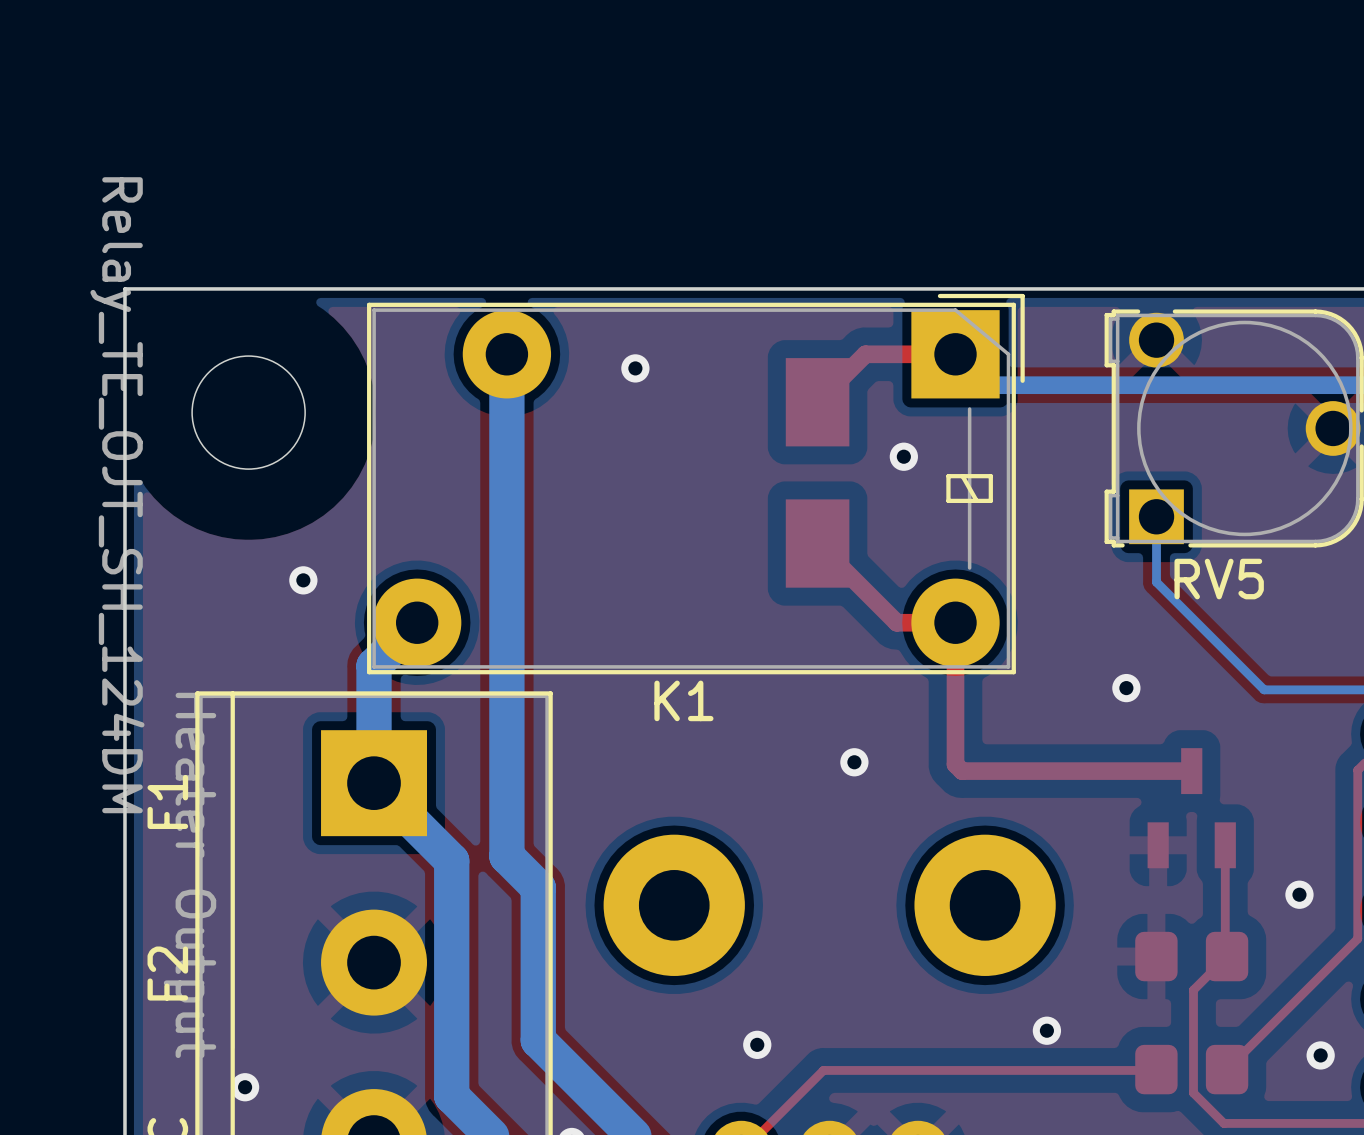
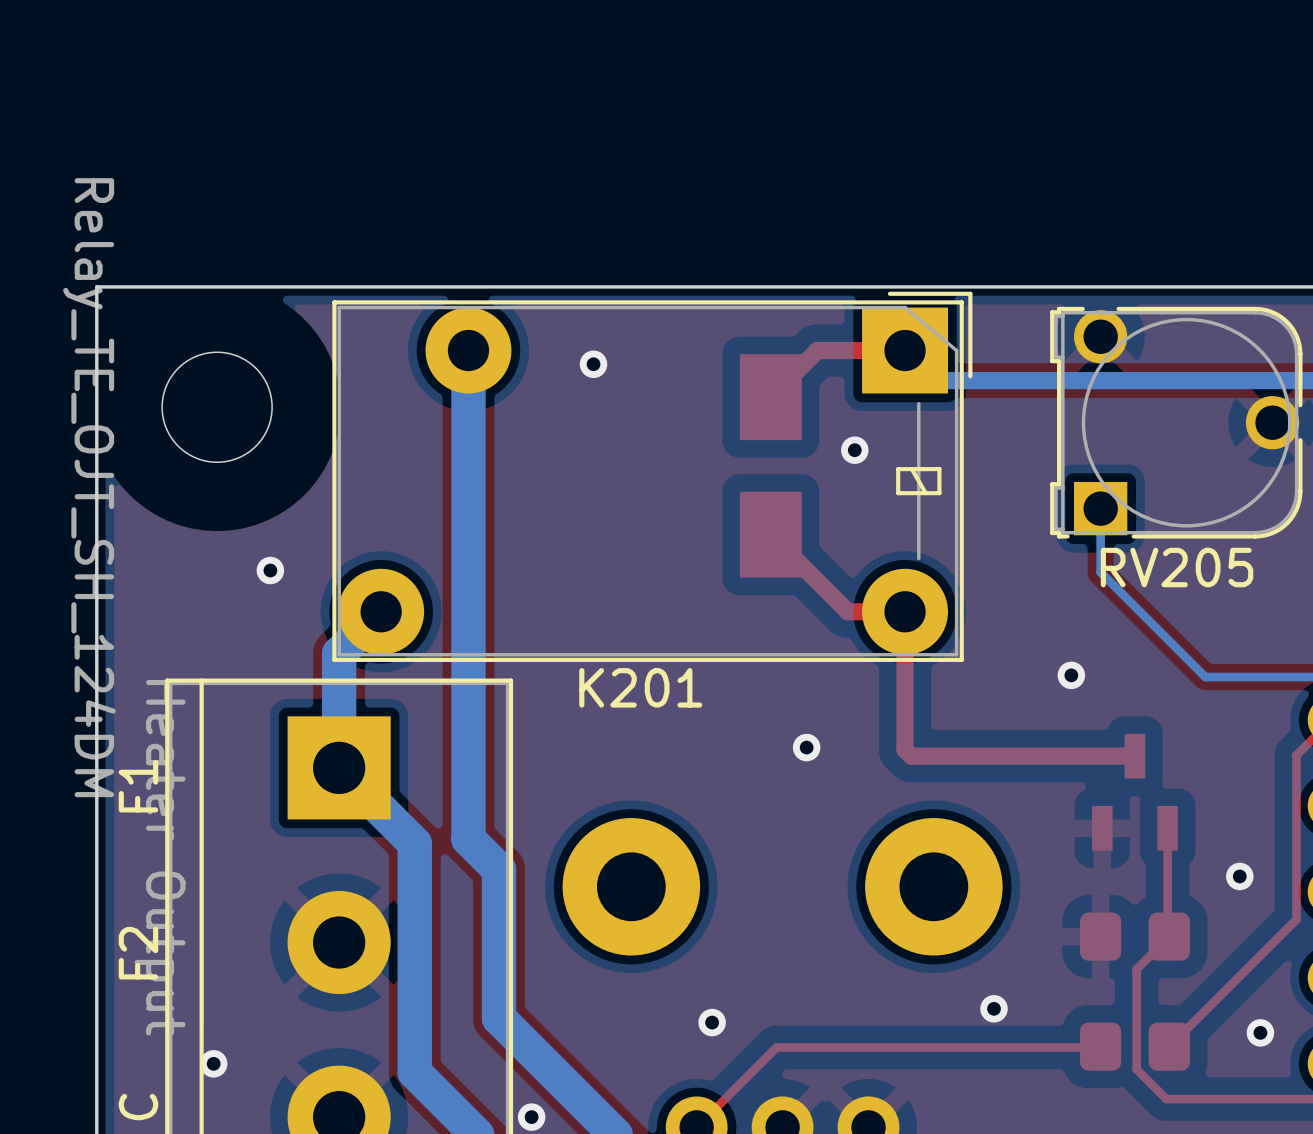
RV5 name: RV5 (1219, 579) -> RV205 (1177, 567)
K1 name: K1 (683, 700) -> K201 (640, 687)

